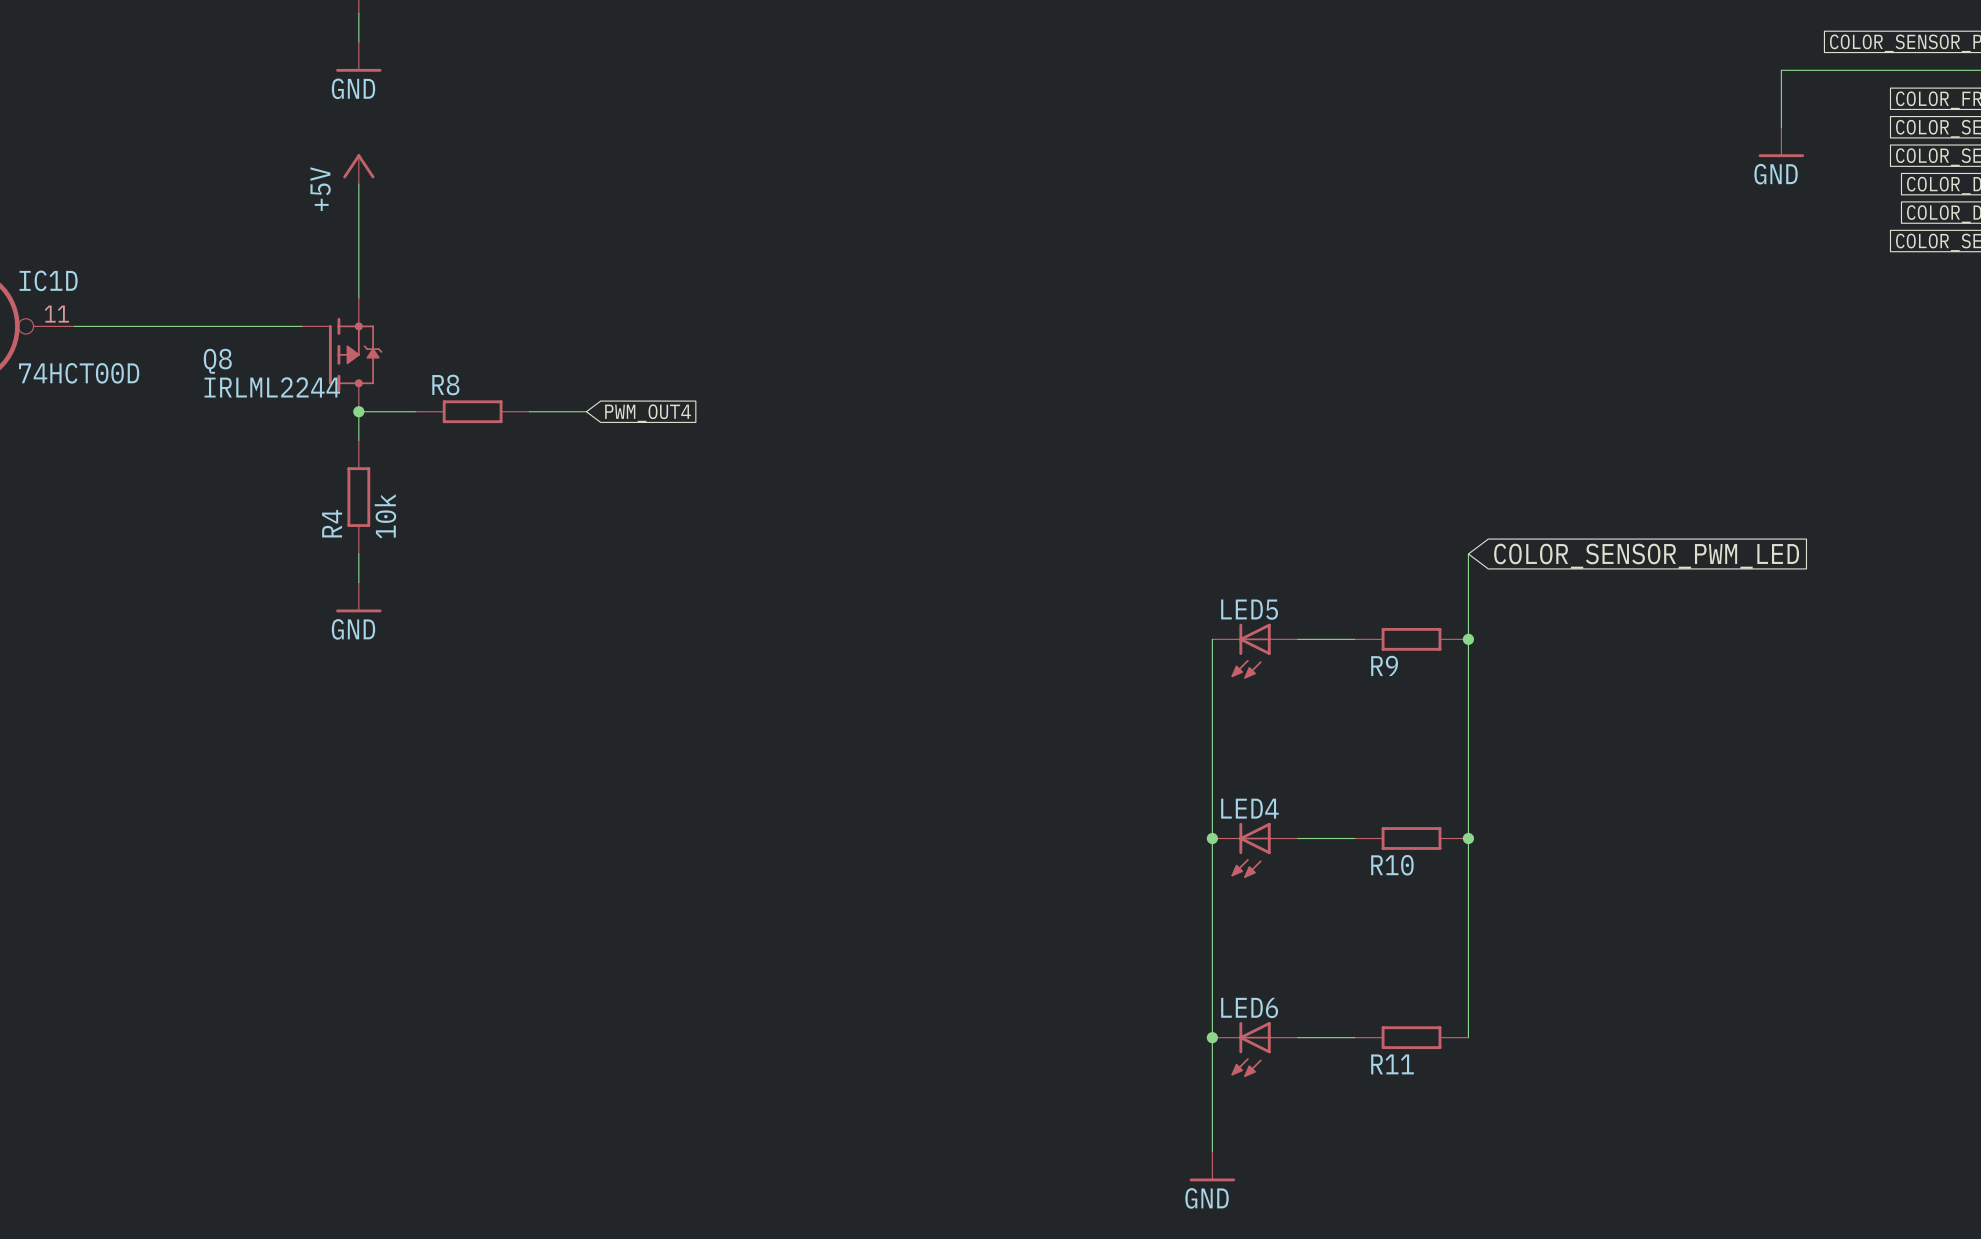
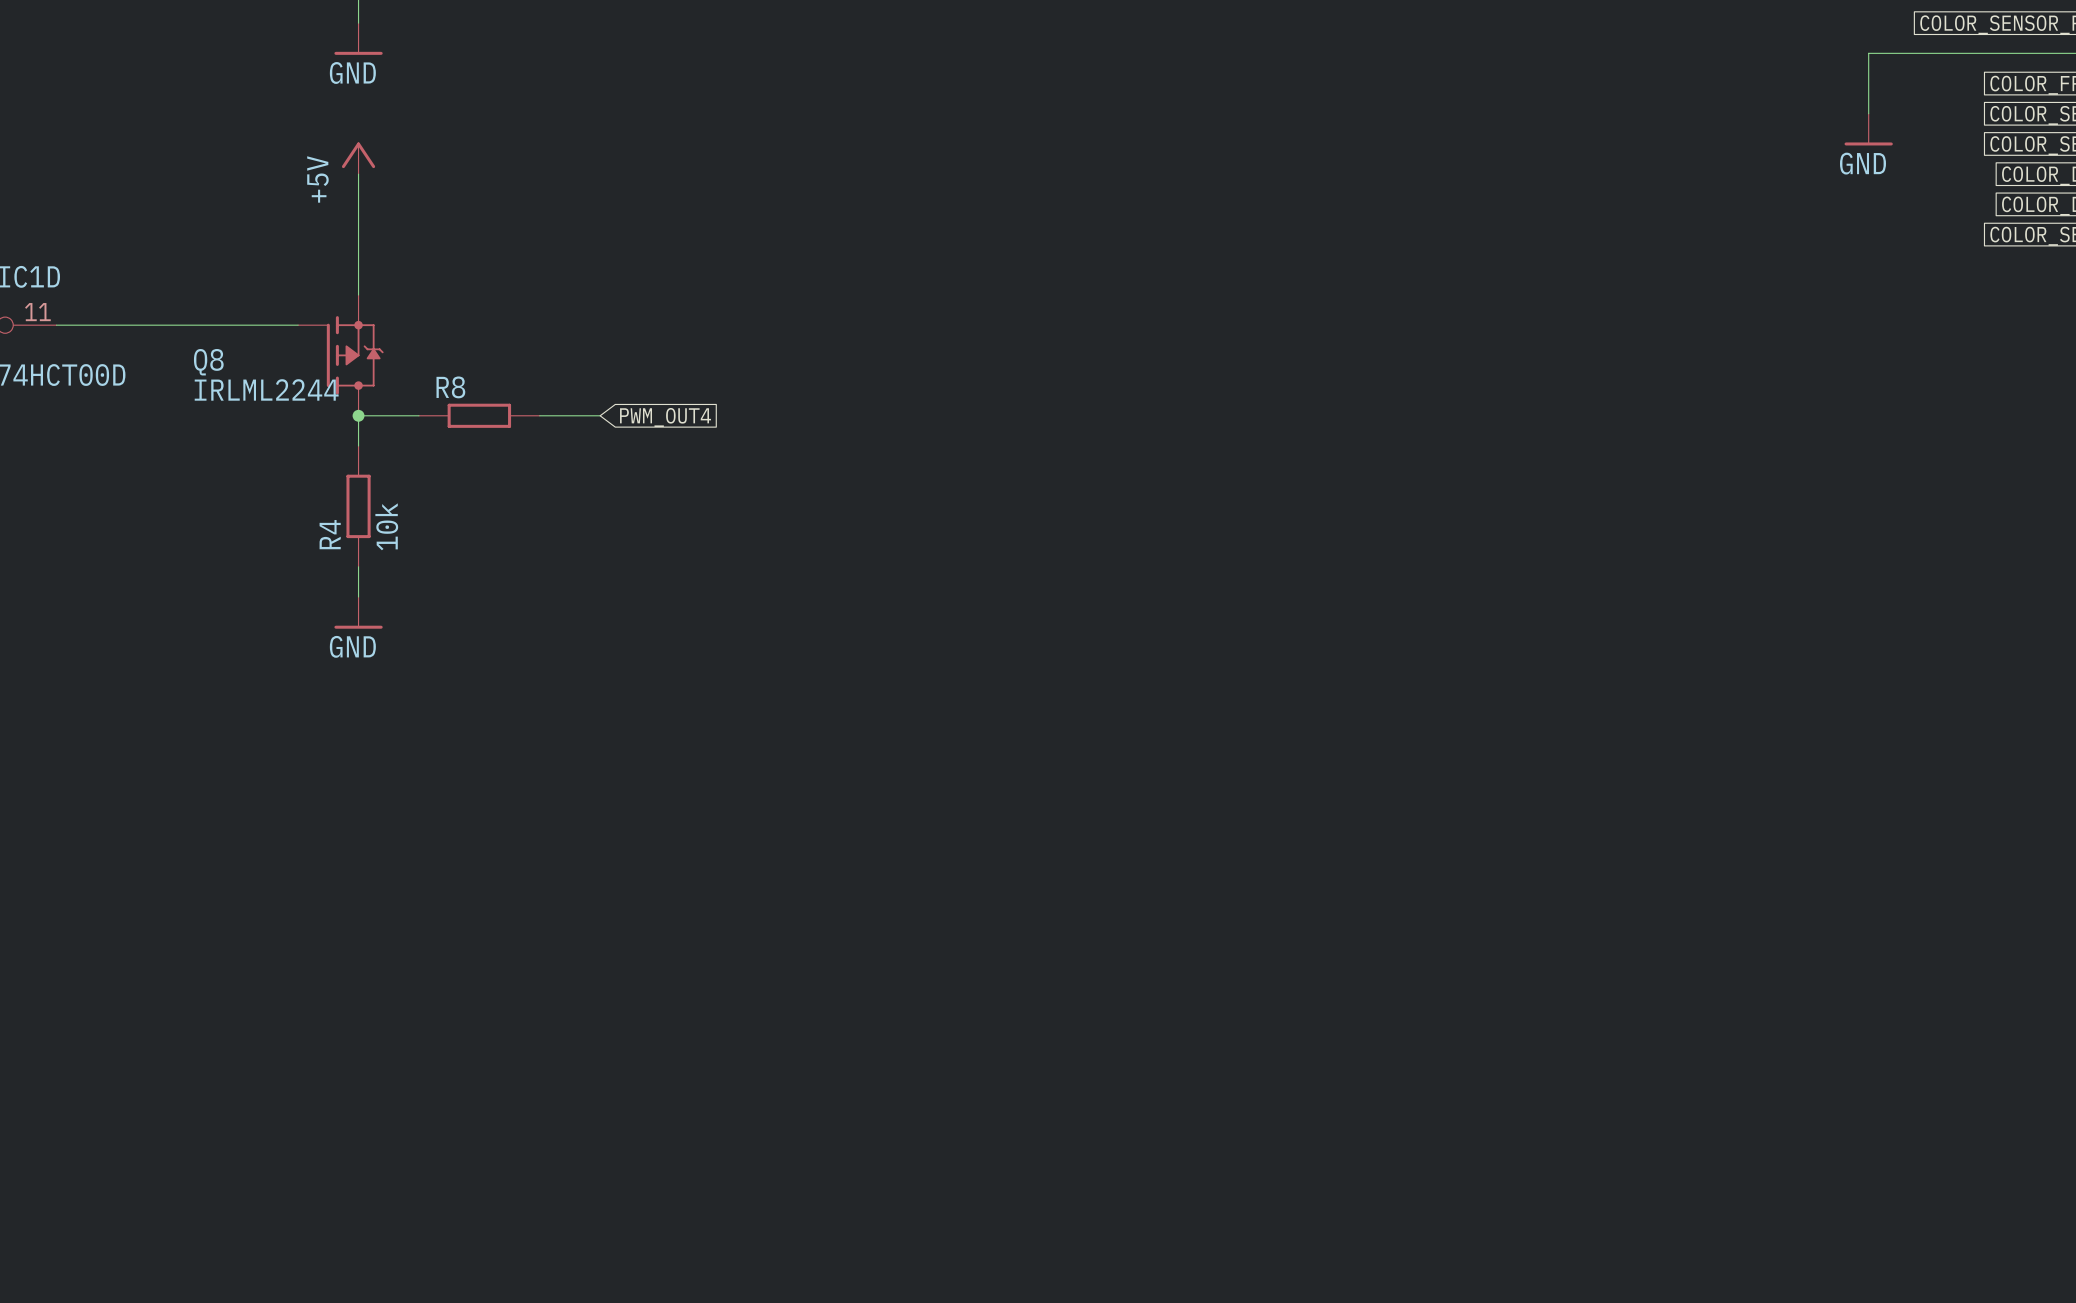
wire: (1468, 554) (1468, 1037) -> none
global label: COLOR_SENSOR_PWM_LED (1646, 556) -> none
wire: (1212, 639) (1212, 1151) -> none
wire: (1297, 639) (1354, 639) -> none
R9: (1411, 639) -> none
junction: (1468, 639) -> none
LED5: (1255, 651) -> none
junction: (1212, 838) -> none
wire: (1297, 838) (1354, 838) -> none
R10: (1411, 838) -> none
junction: (1468, 838) -> none
LED4: (1255, 850) -> none
junction: (1212, 1037) -> none
wire: (1297, 1037) (1354, 1037) -> none
R11: (1411, 1037) -> none
LED6: (1255, 1049) -> none
power symbol: GND (1212, 1166) -> none

